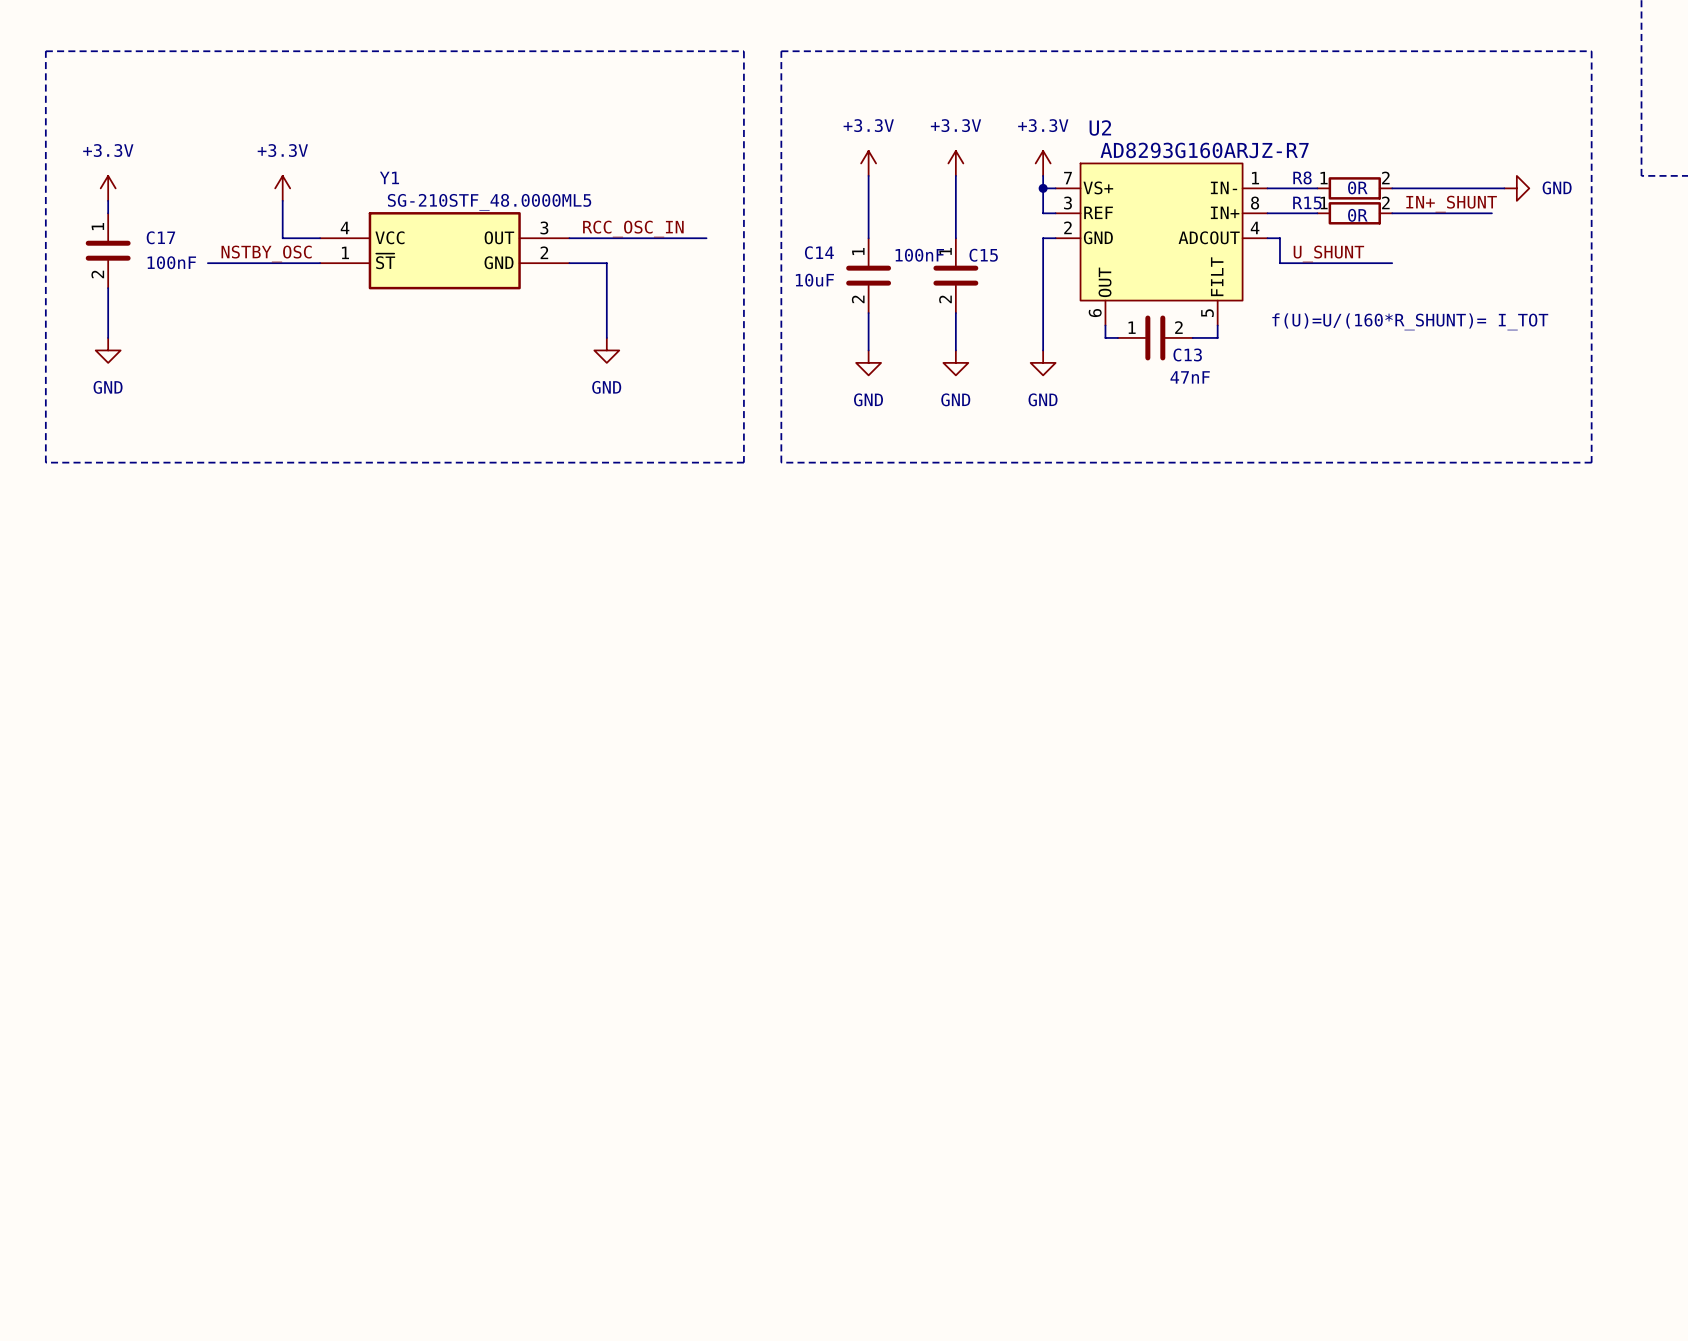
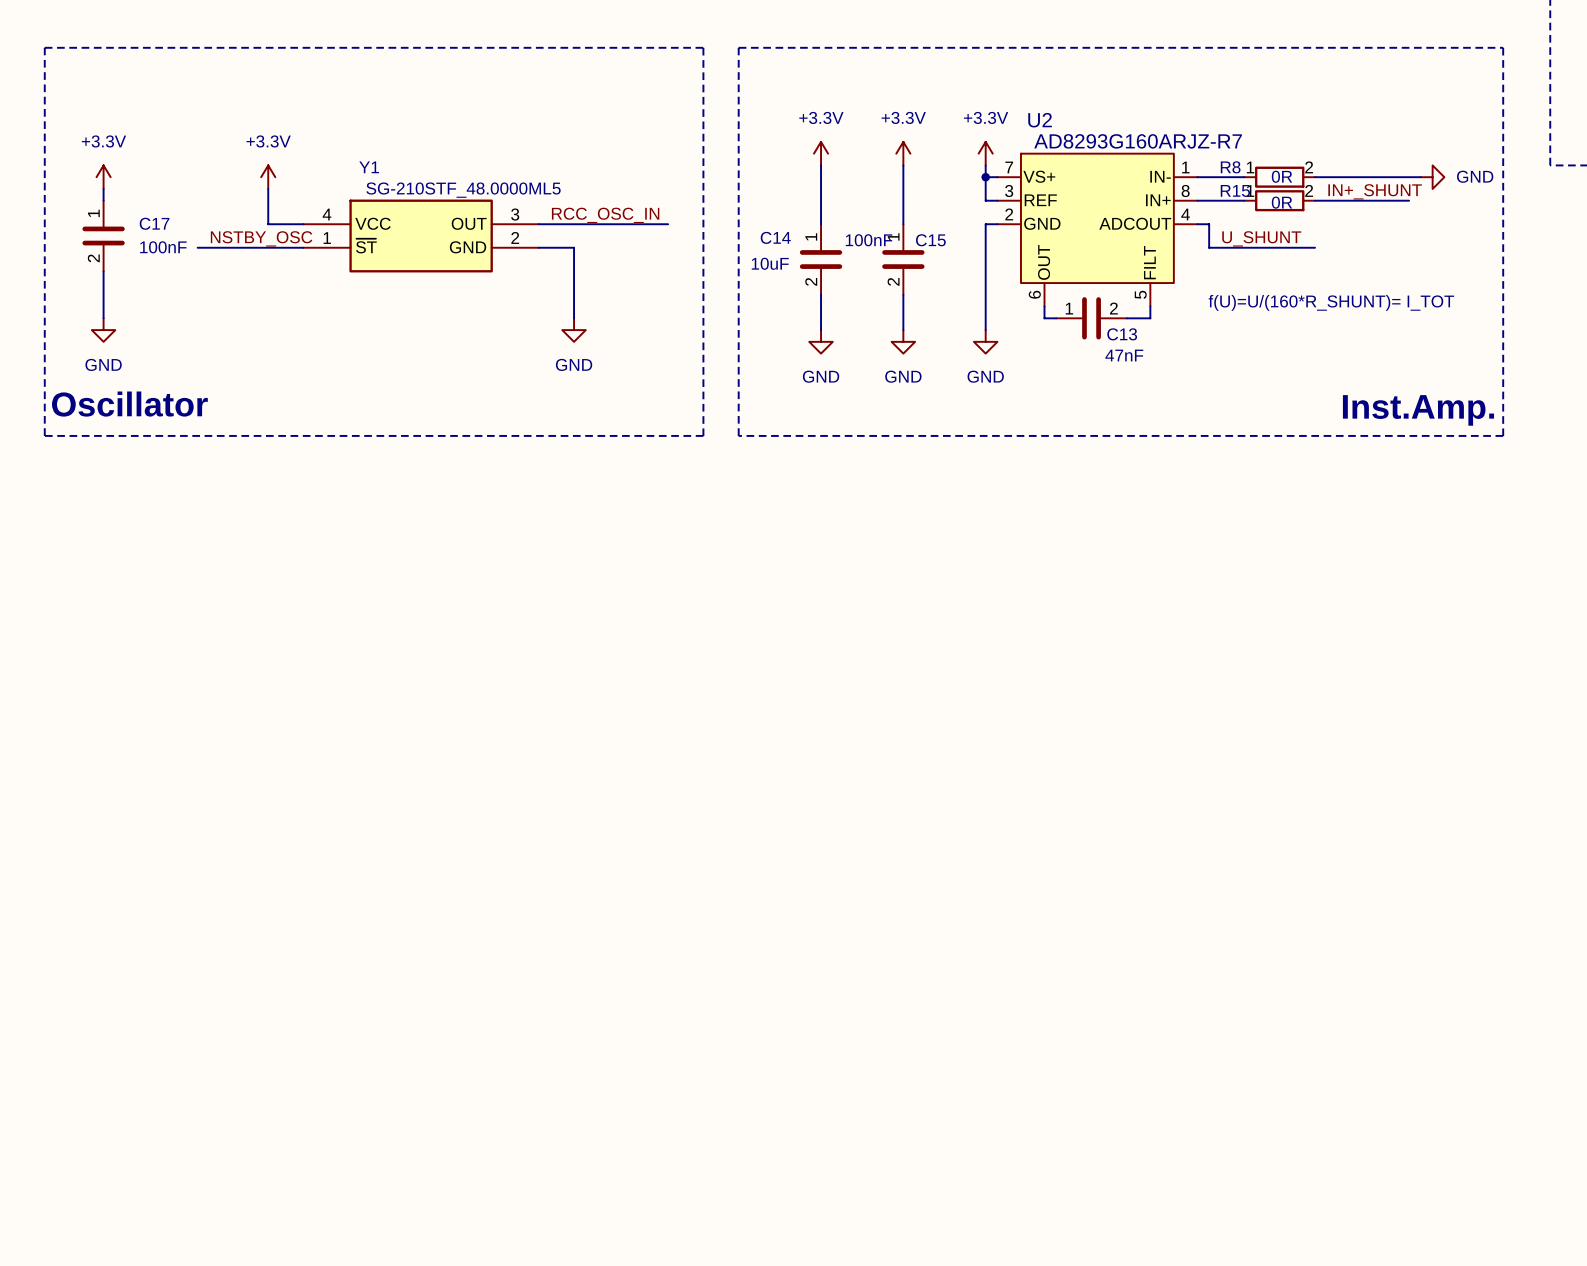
text: none -> Oscillator (129, 404)
text: none -> Inst.Amp. (1418, 410)

